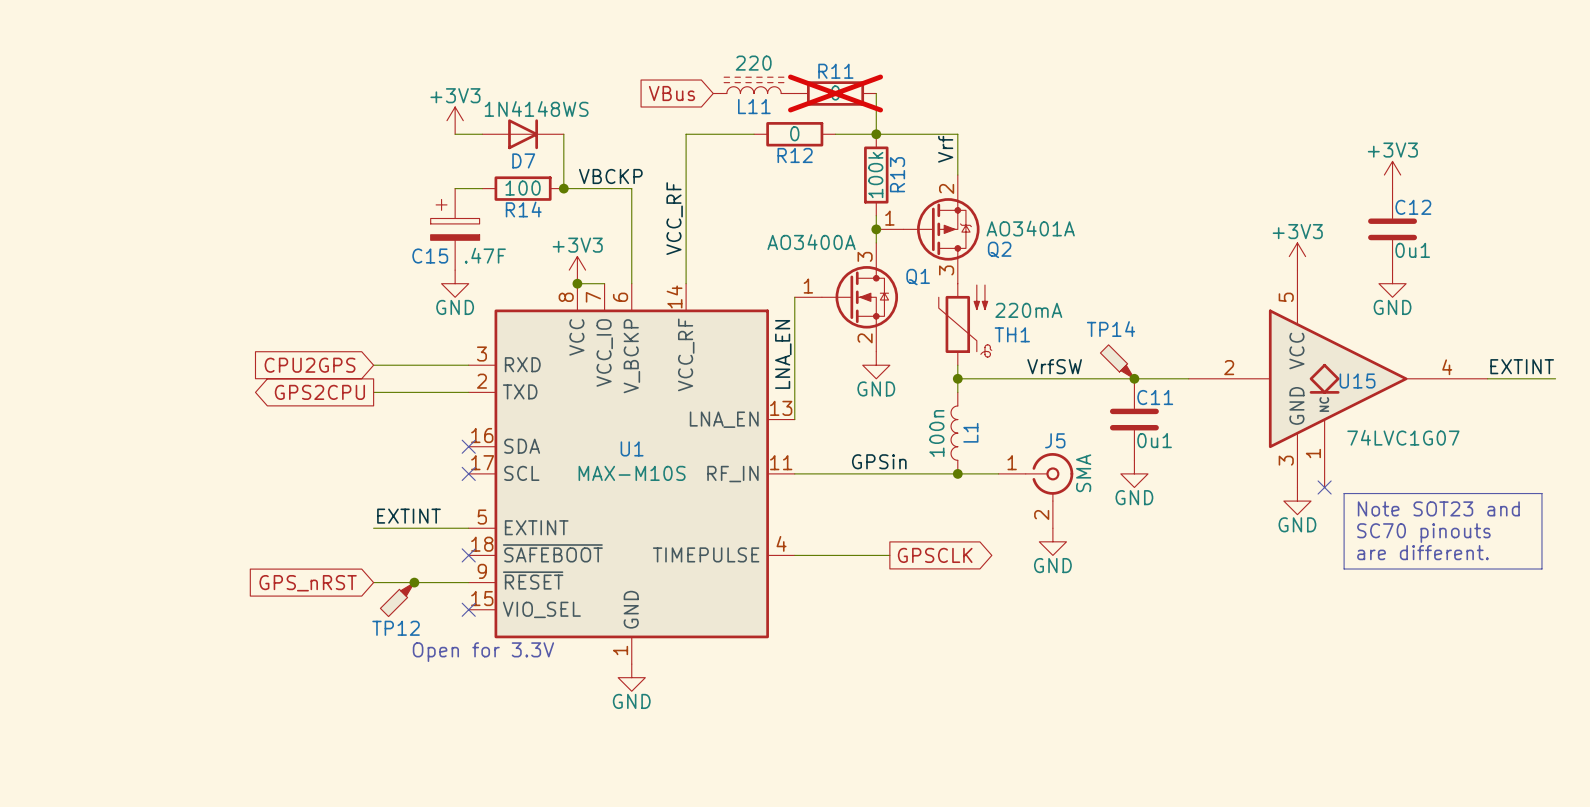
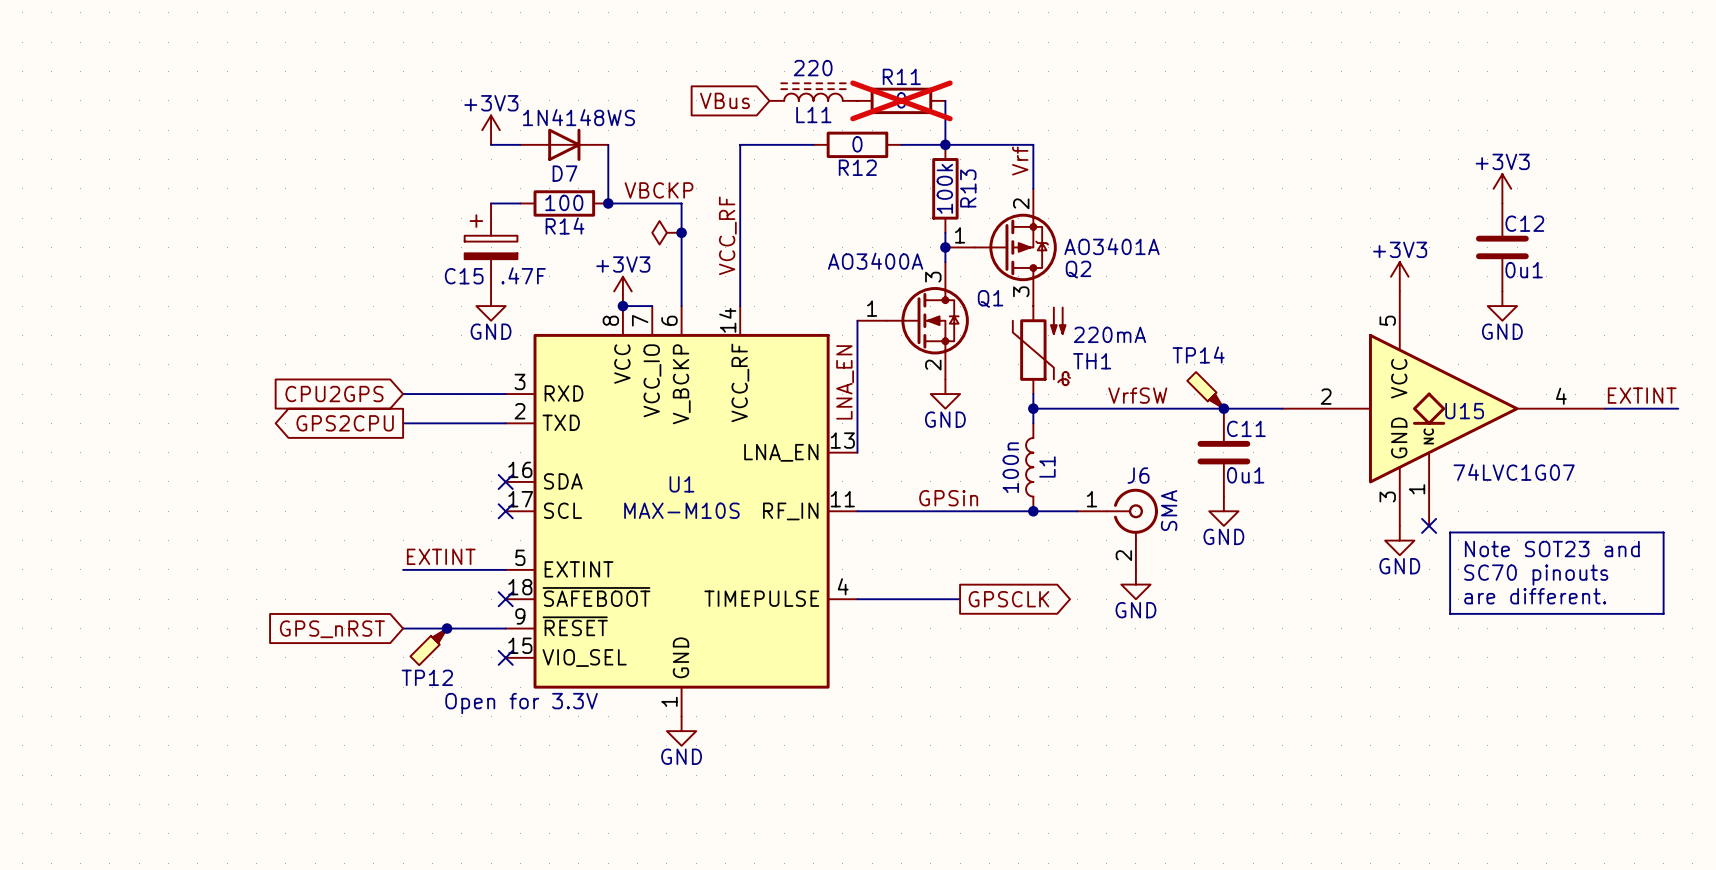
power symbol: none -> (666, 232)
junction: none -> (681, 232)
J5 name: J5 (1055, 440) -> J6 (1138, 475)

